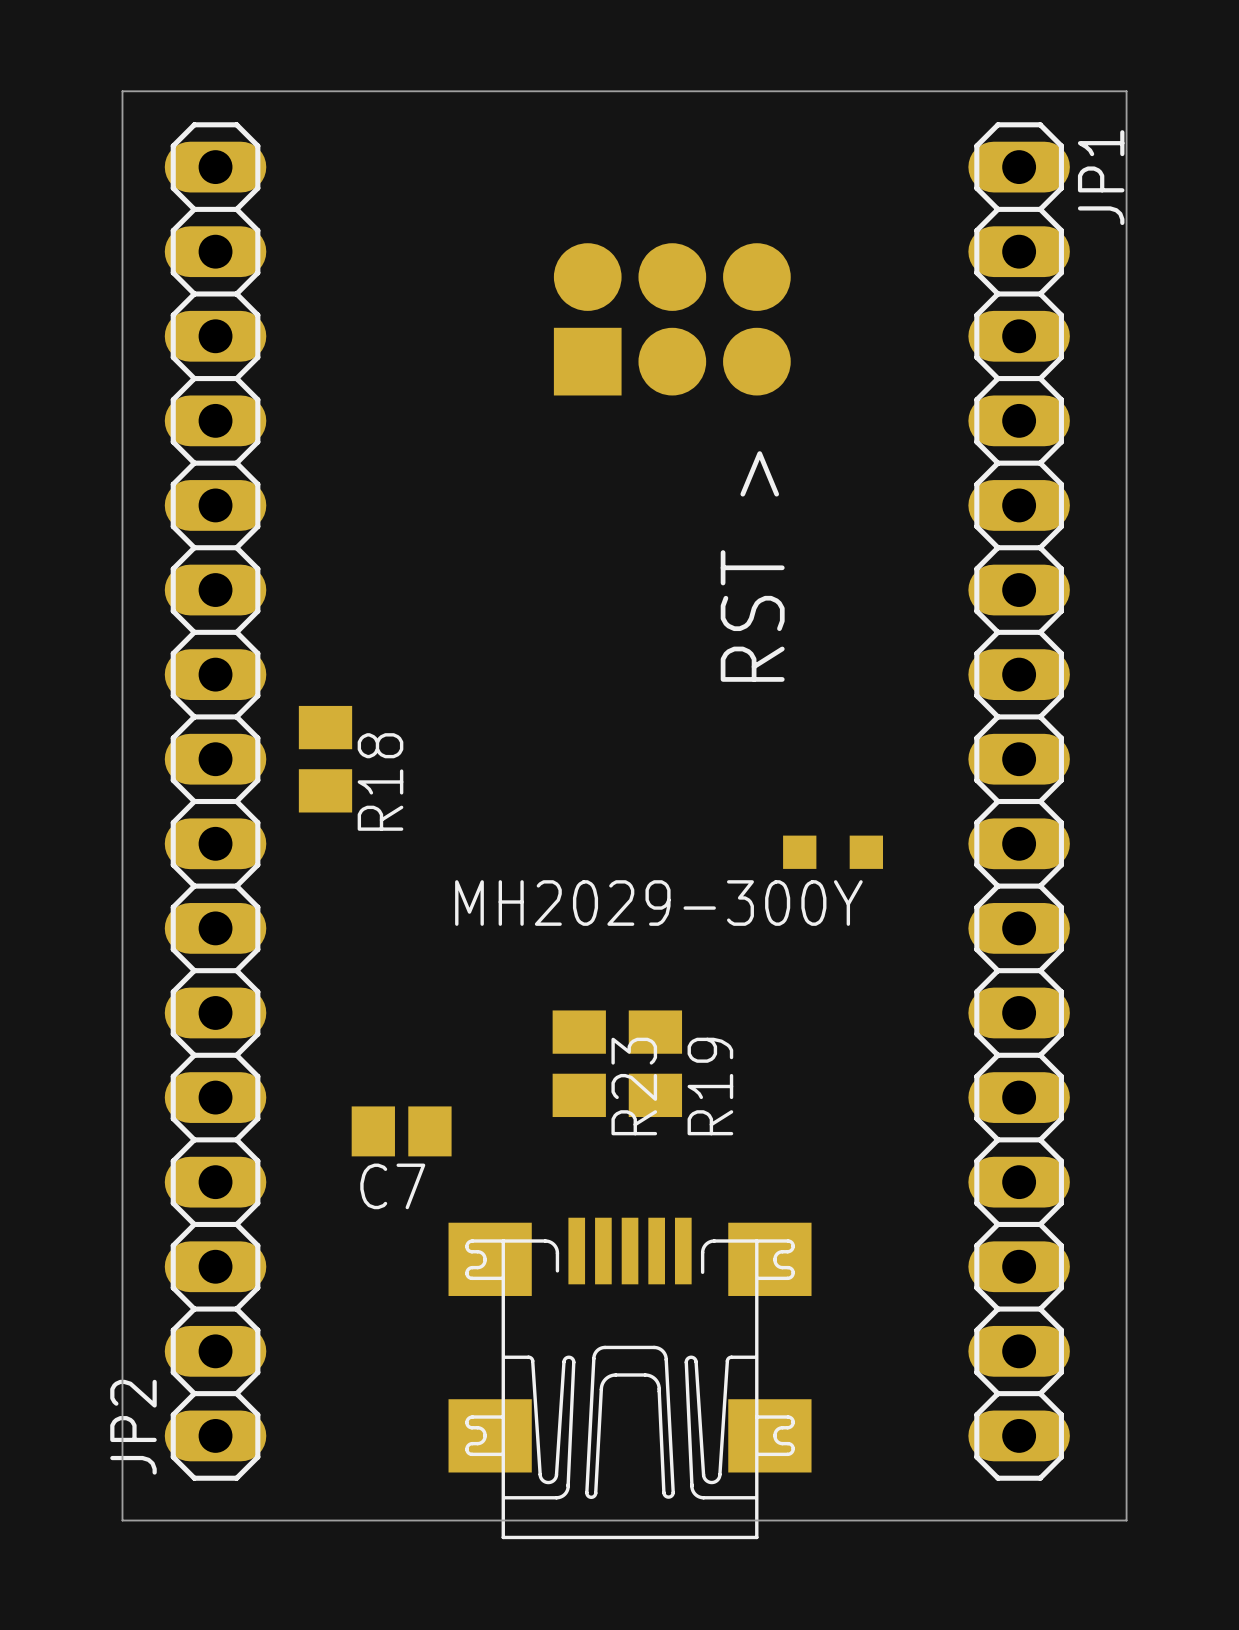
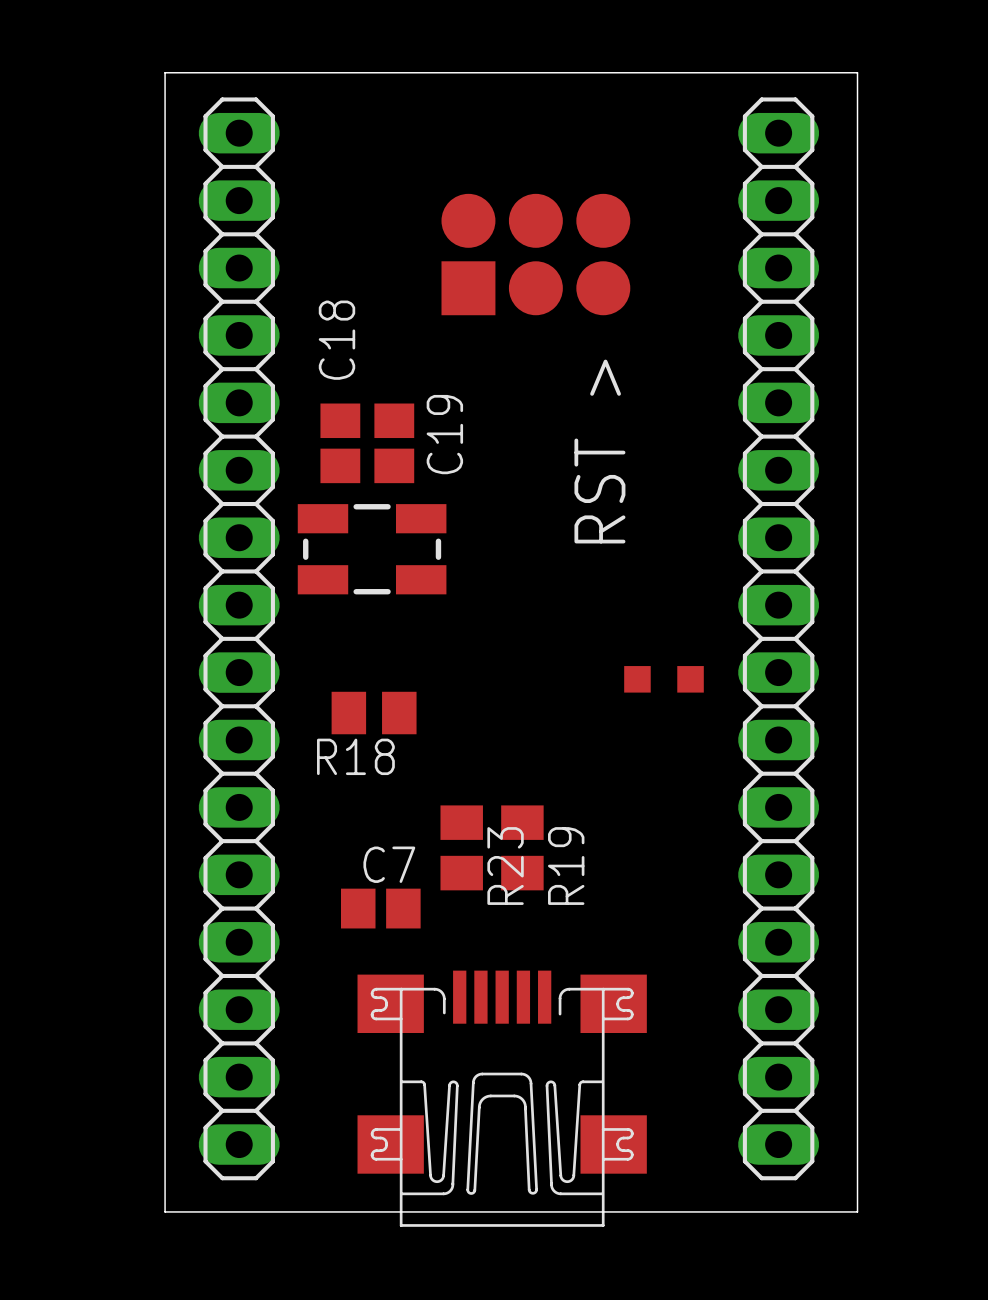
board edge: (207, 91) (122, 91) (122, 1520) (207, 1520) -> (165, 72) (165, 1211)
board edge: (1075, 91) (1126, 91) (1126, 1520) (1075, 1520) -> (857, 72) (857, 1211)
C18: none -> (340, 443)
C19: none -> (394, 443)
part: none -> (372, 549)
R18 rotation: 0° (325, 759) -> 90° clockwise (374, 713)
R18 position: (325, 759) -> (374, 713)
JP2: (215, 801) -> none
part: none -> (239, 638)
part: none -> (778, 638)
JP1: (1019, 801) -> none
MH2029-300Y name: MH2029-300Y (658, 903) -> none
C7 position: (401, 1131) -> (380, 908)
C7 name position: C7 (392, 1186) -> C7 (389, 864)

